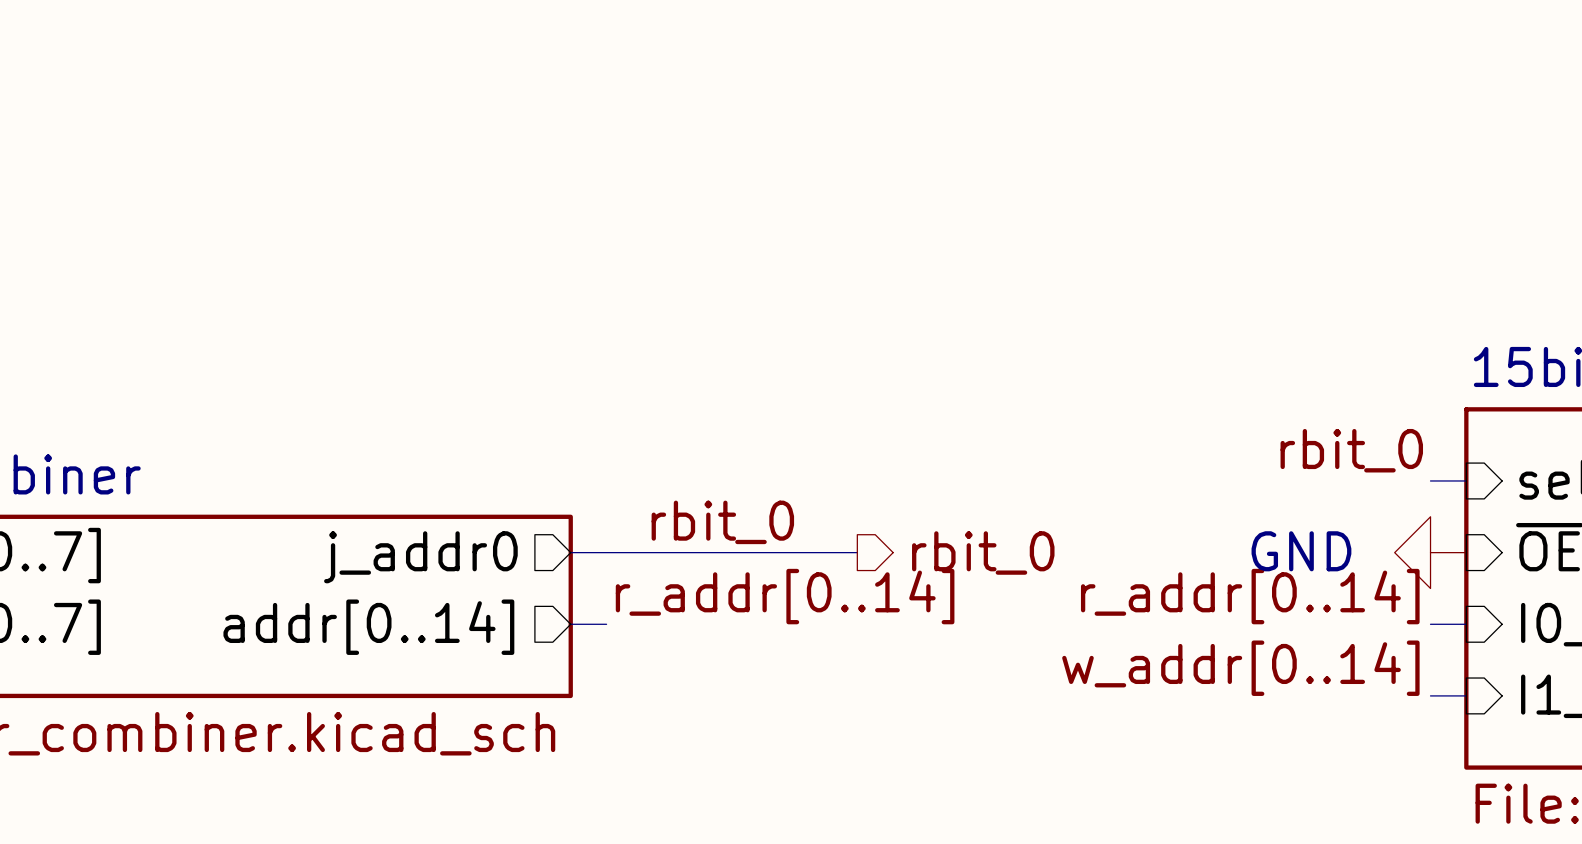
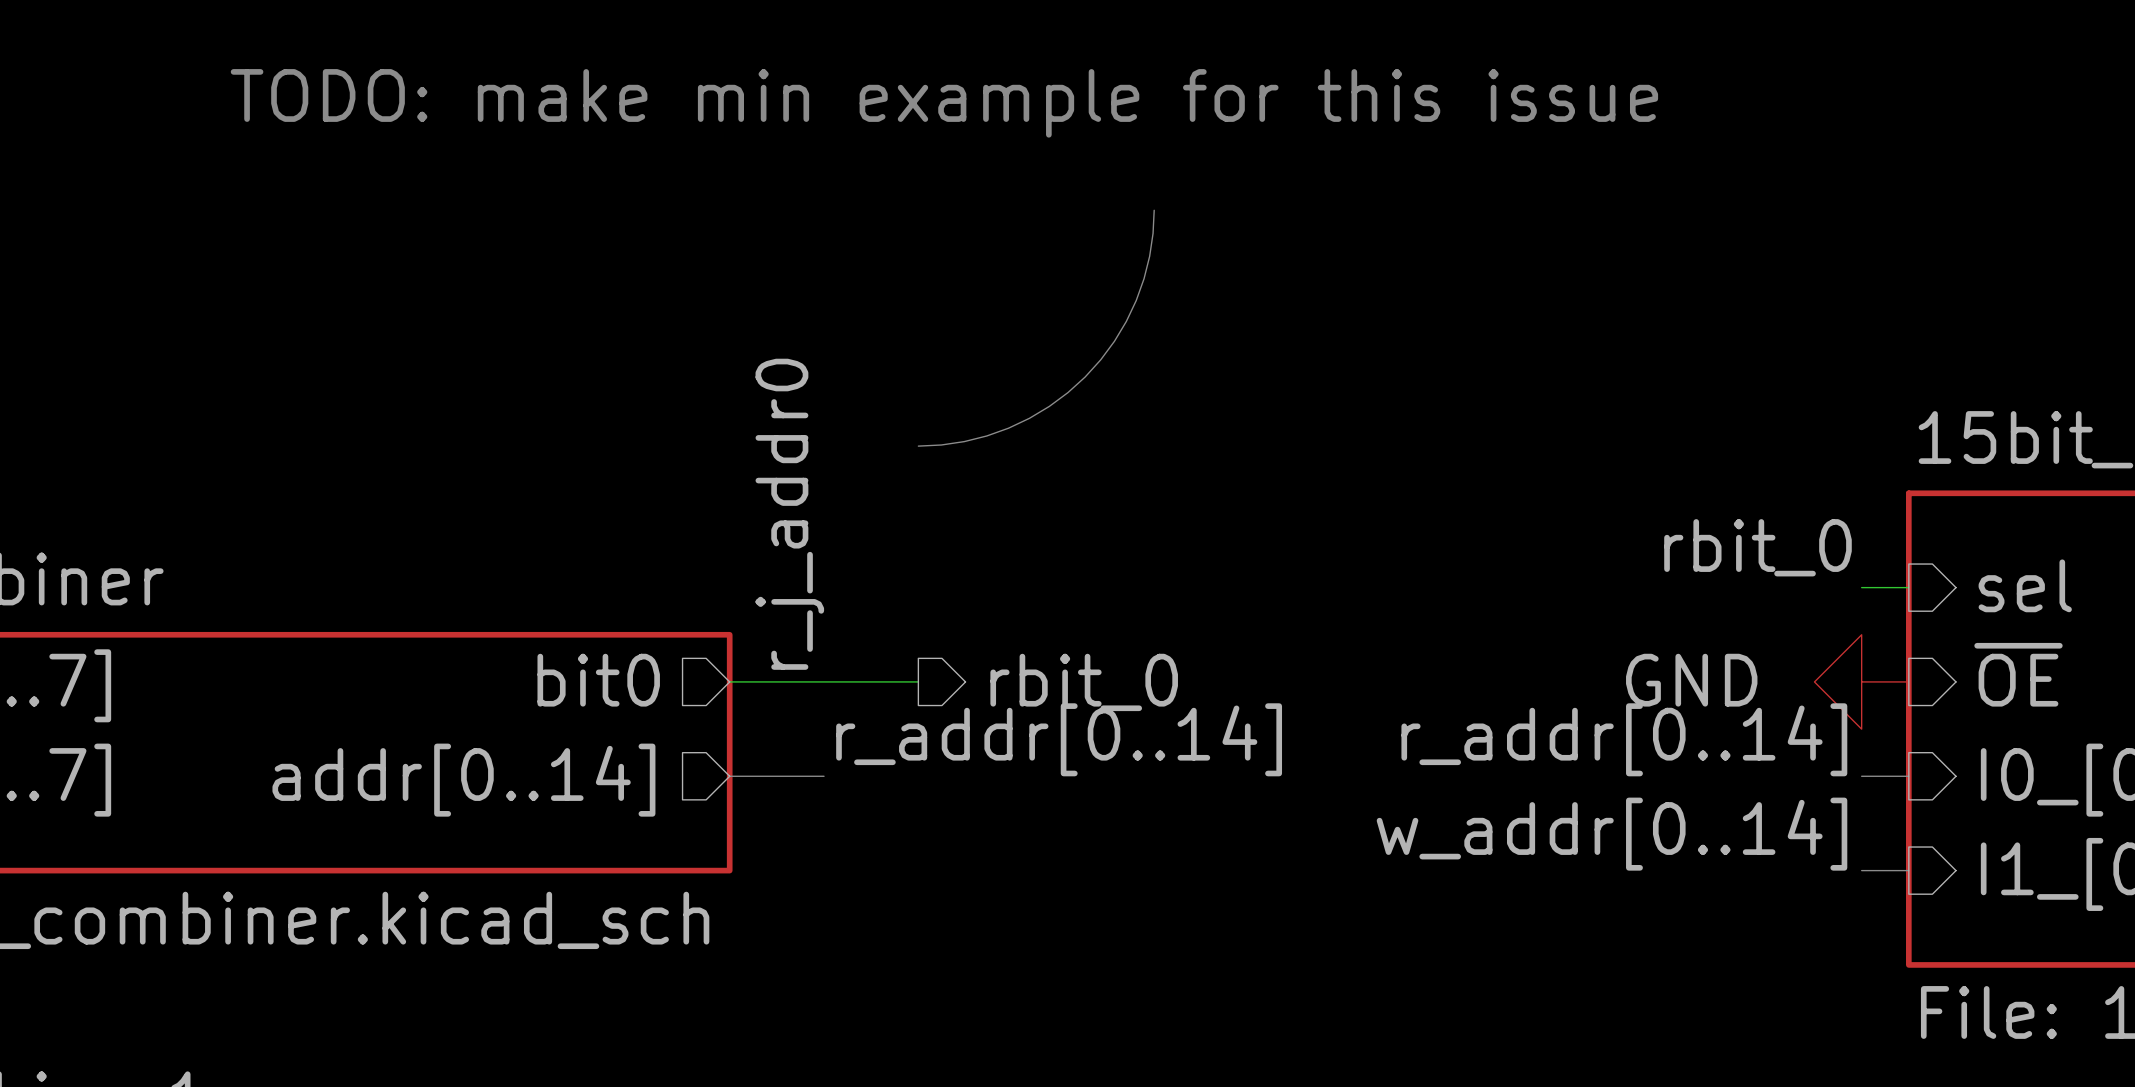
text: none -> TODO: make min example for this issue (944, 103)
line: none -> (1154, 210) (1149, 256) (1136, 300) (1114, 341) (1085, 377) (1049, 406) (1008, 428) (964, 441) (918, 446)
label: rbit_0 (722, 522) -> r_j_addr0 (789, 514)
wire: (714, 552) (857, 552) -> none
hierarchical label position: rbit_0 (983, 553) -> rbit_0 (1084, 682)
sheet pin: j_addr0 (420, 557) -> bit0 (598, 680)
label position: r_addr[0..14] (785, 596) -> r_addr[0..14] (1059, 739)
bus: none -> (776, 776) (824, 776)

